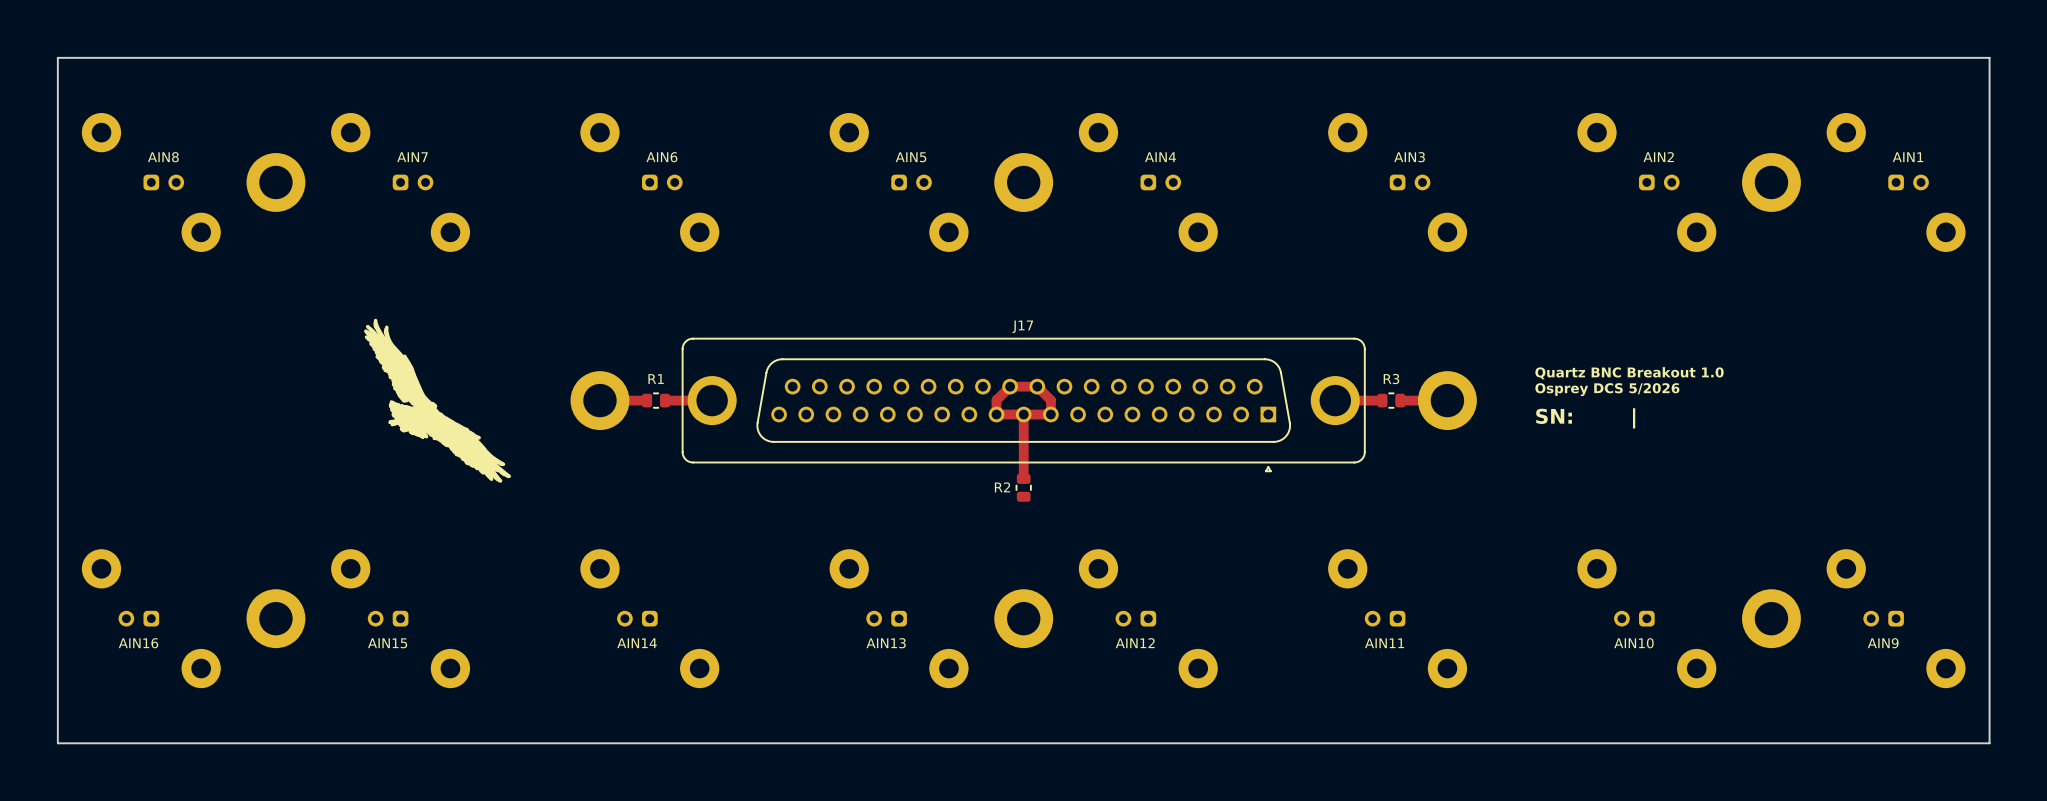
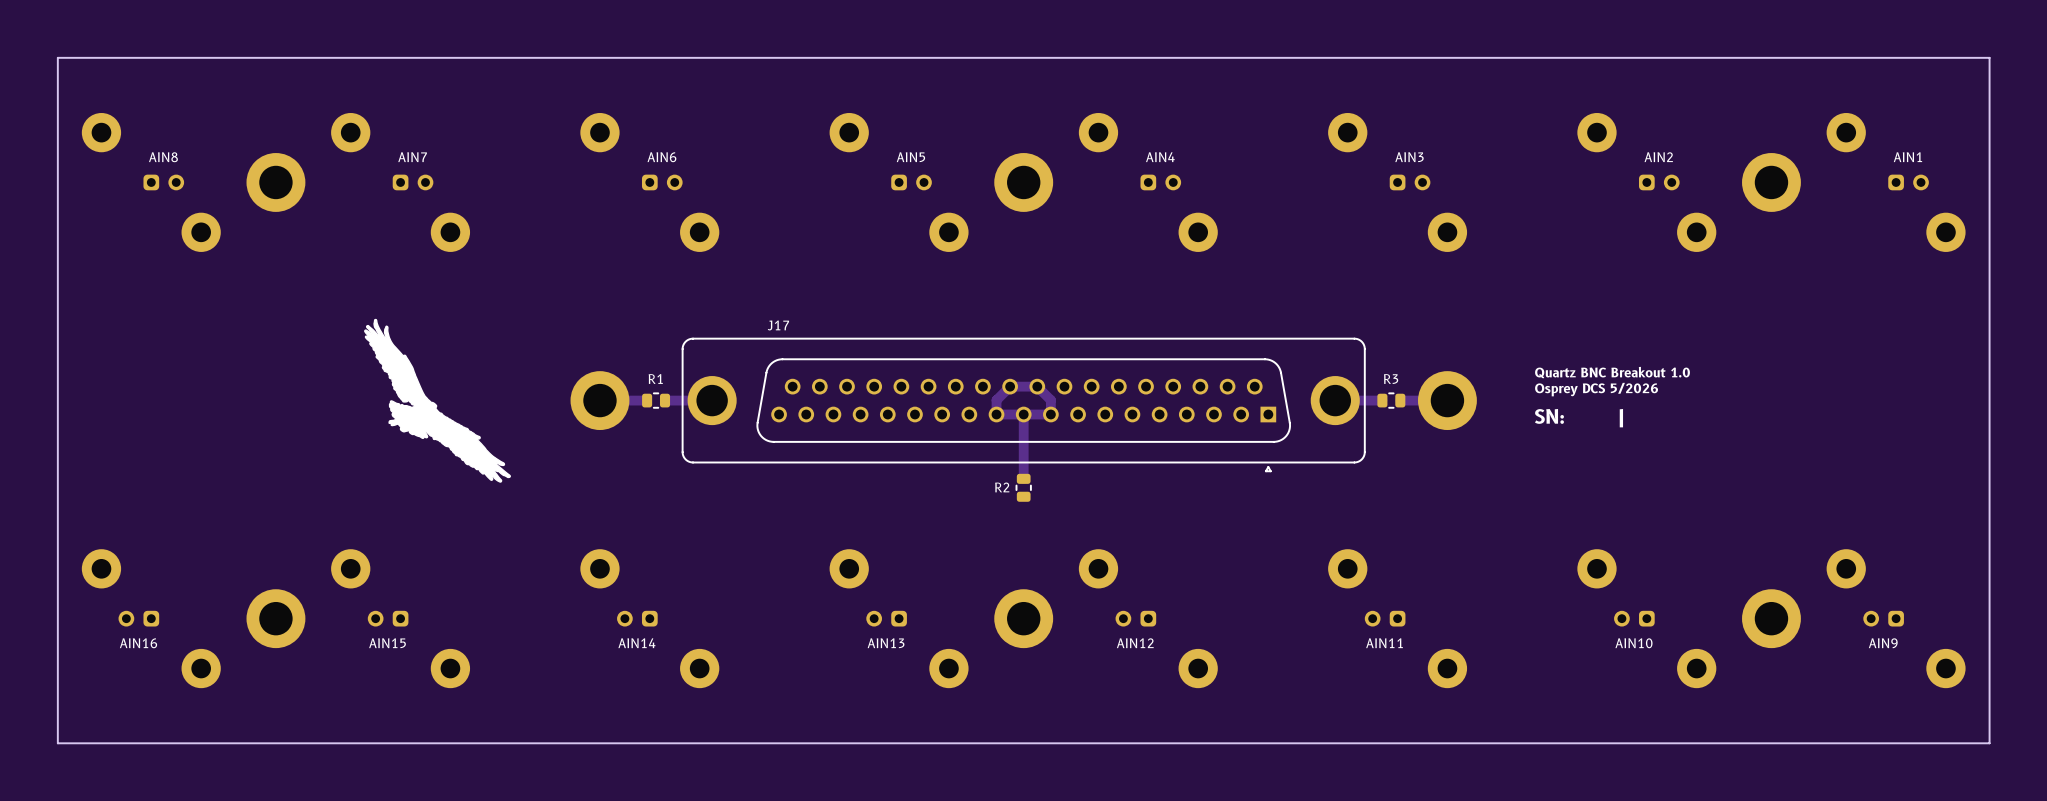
J17 name position: J17 (1022, 326) -> J17 (778, 325)

